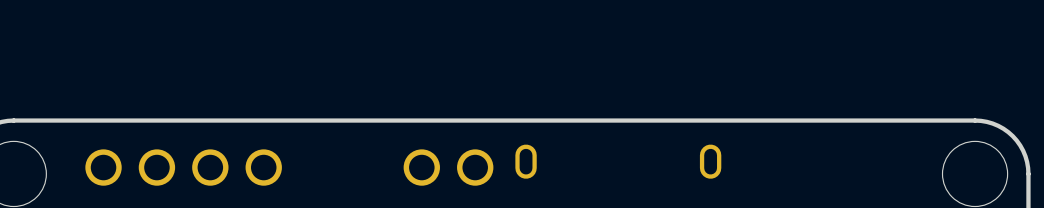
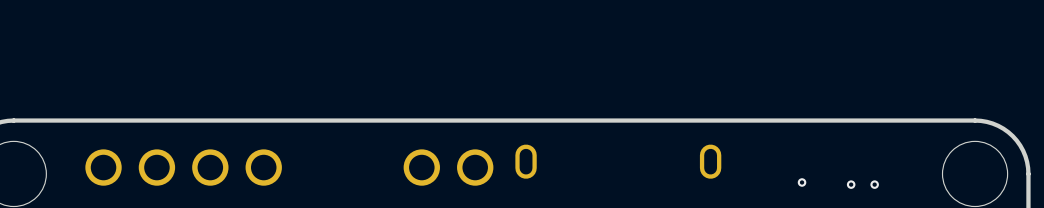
via: none -> (802, 182)
via: none -> (851, 184)
via: none -> (874, 184)

